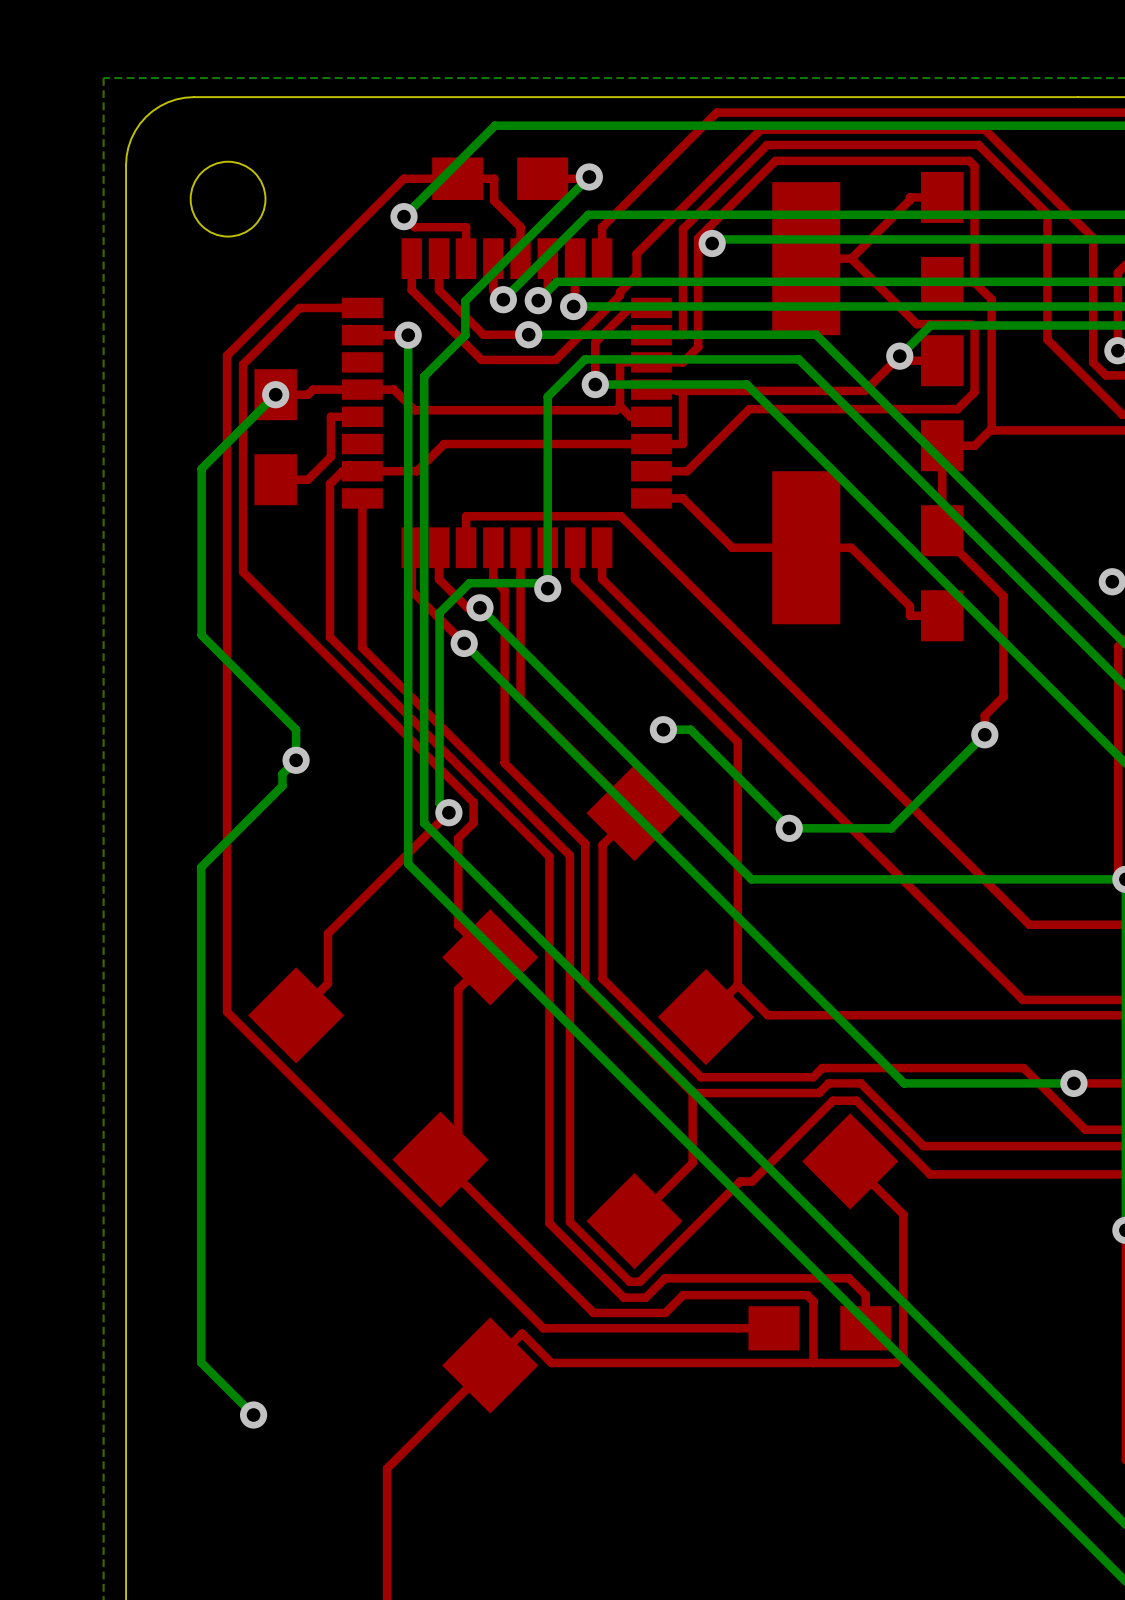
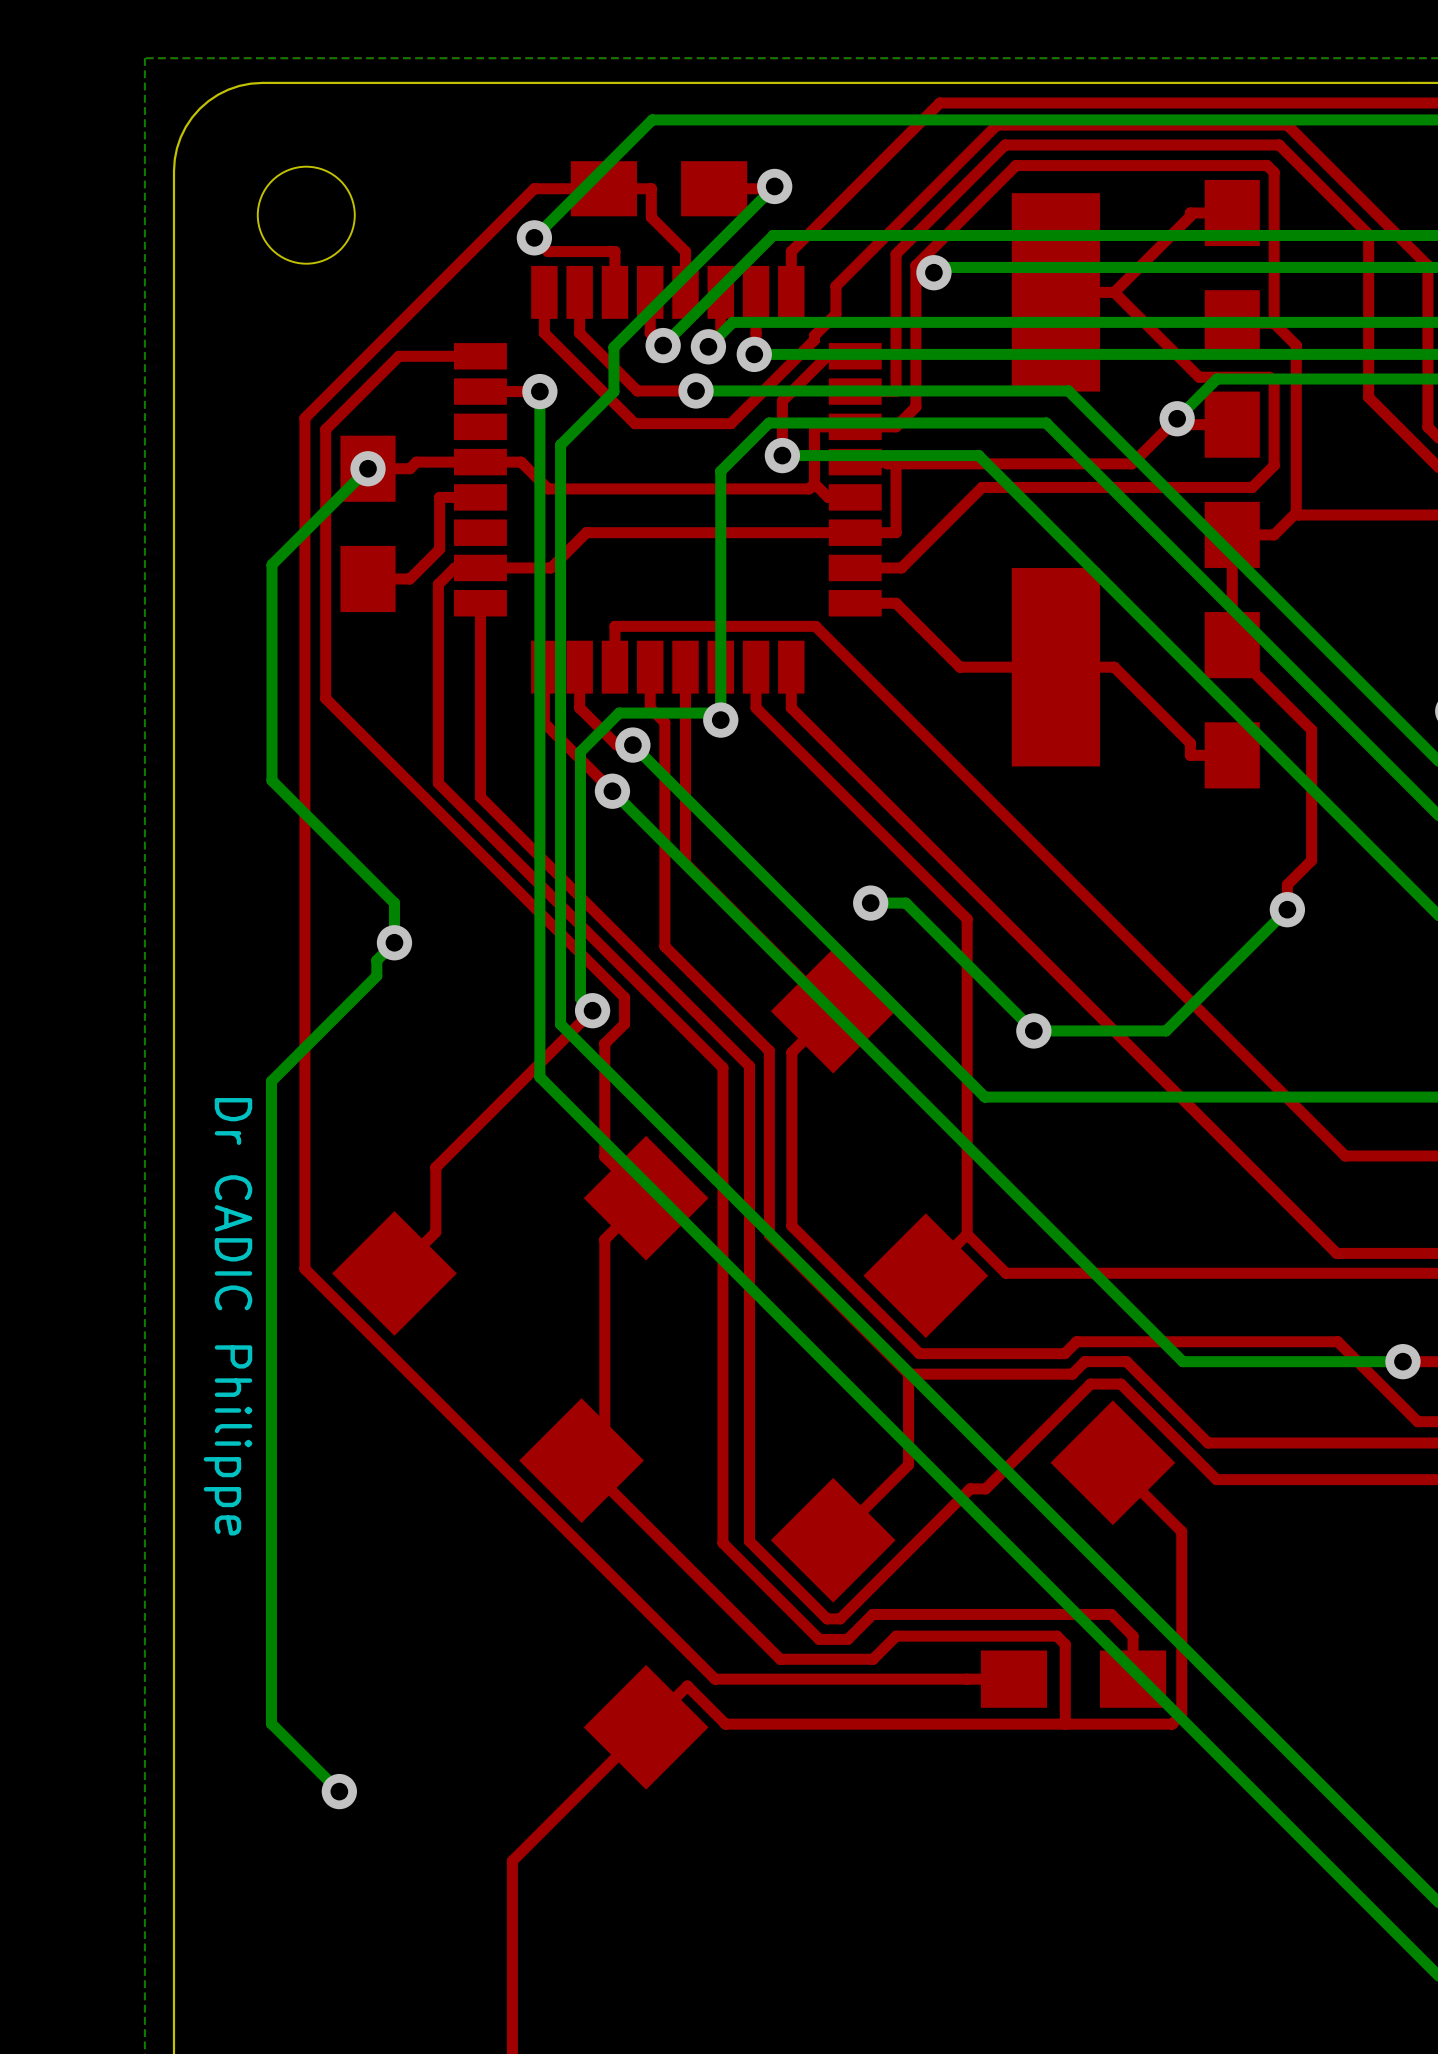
text: none -> Dr CADIC Philippe (227, 1316)

